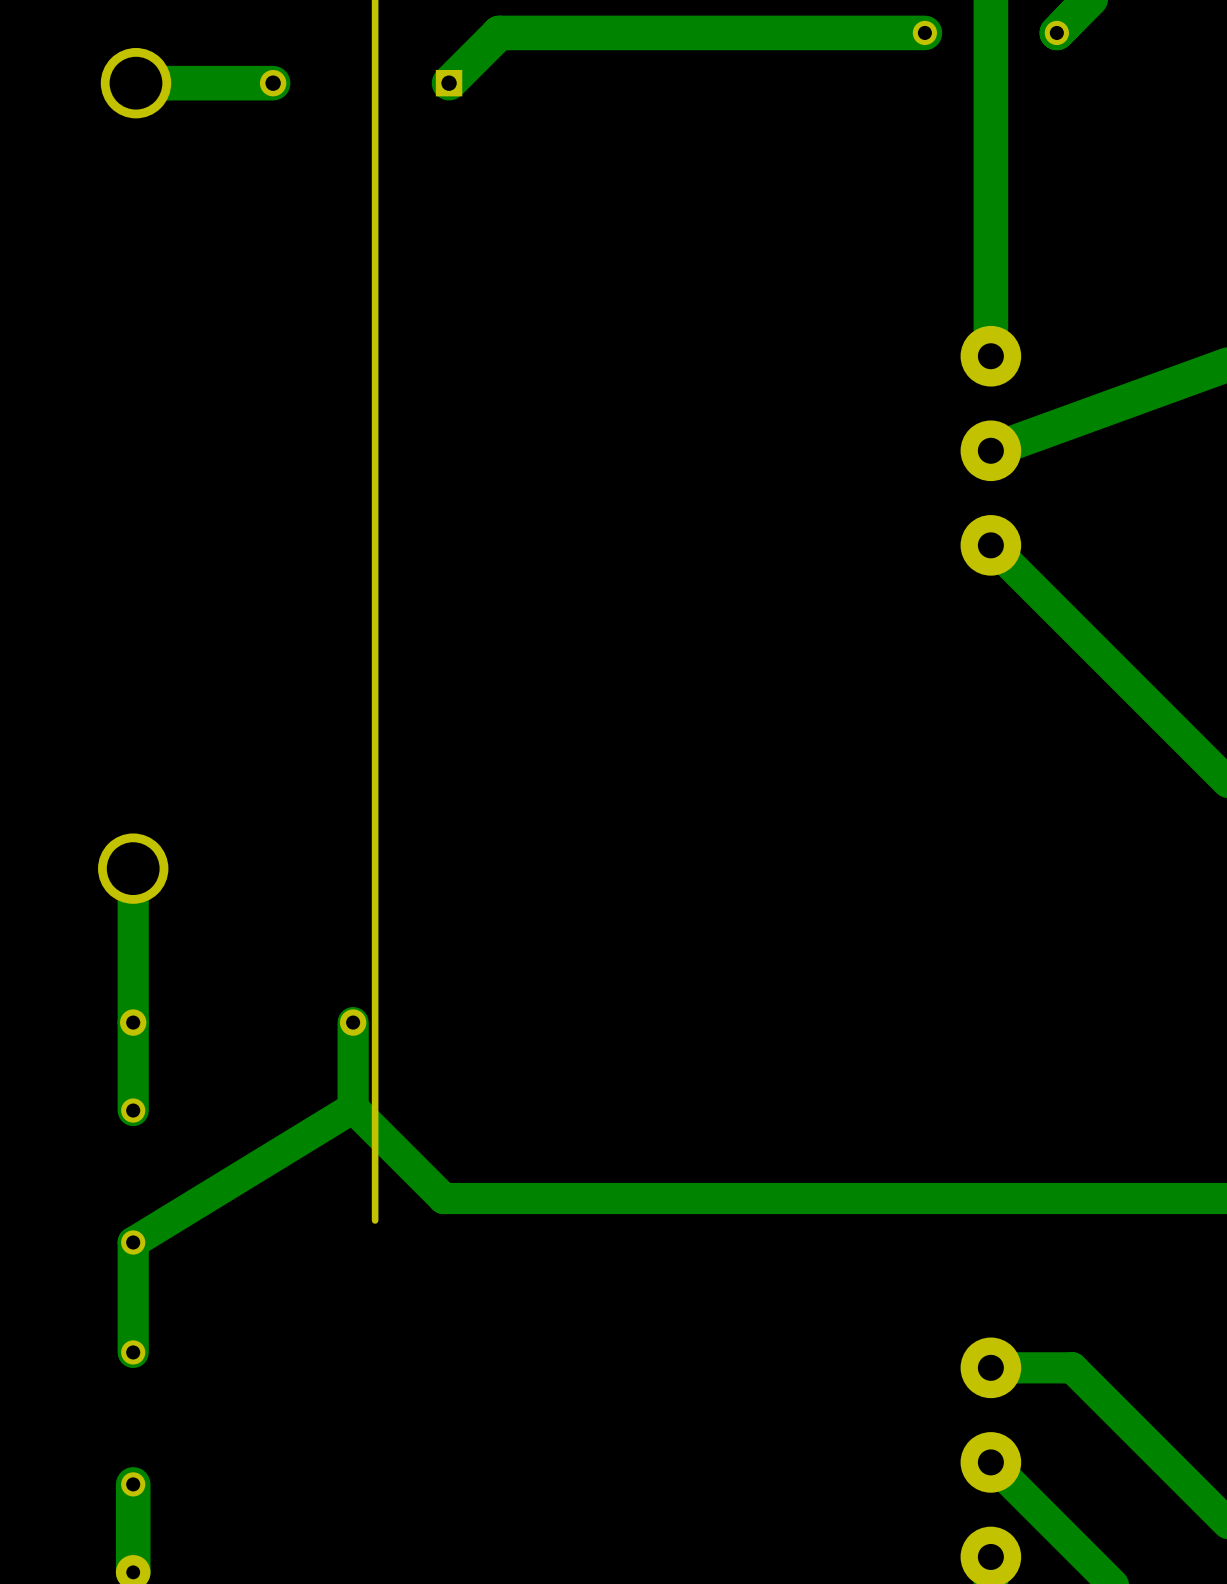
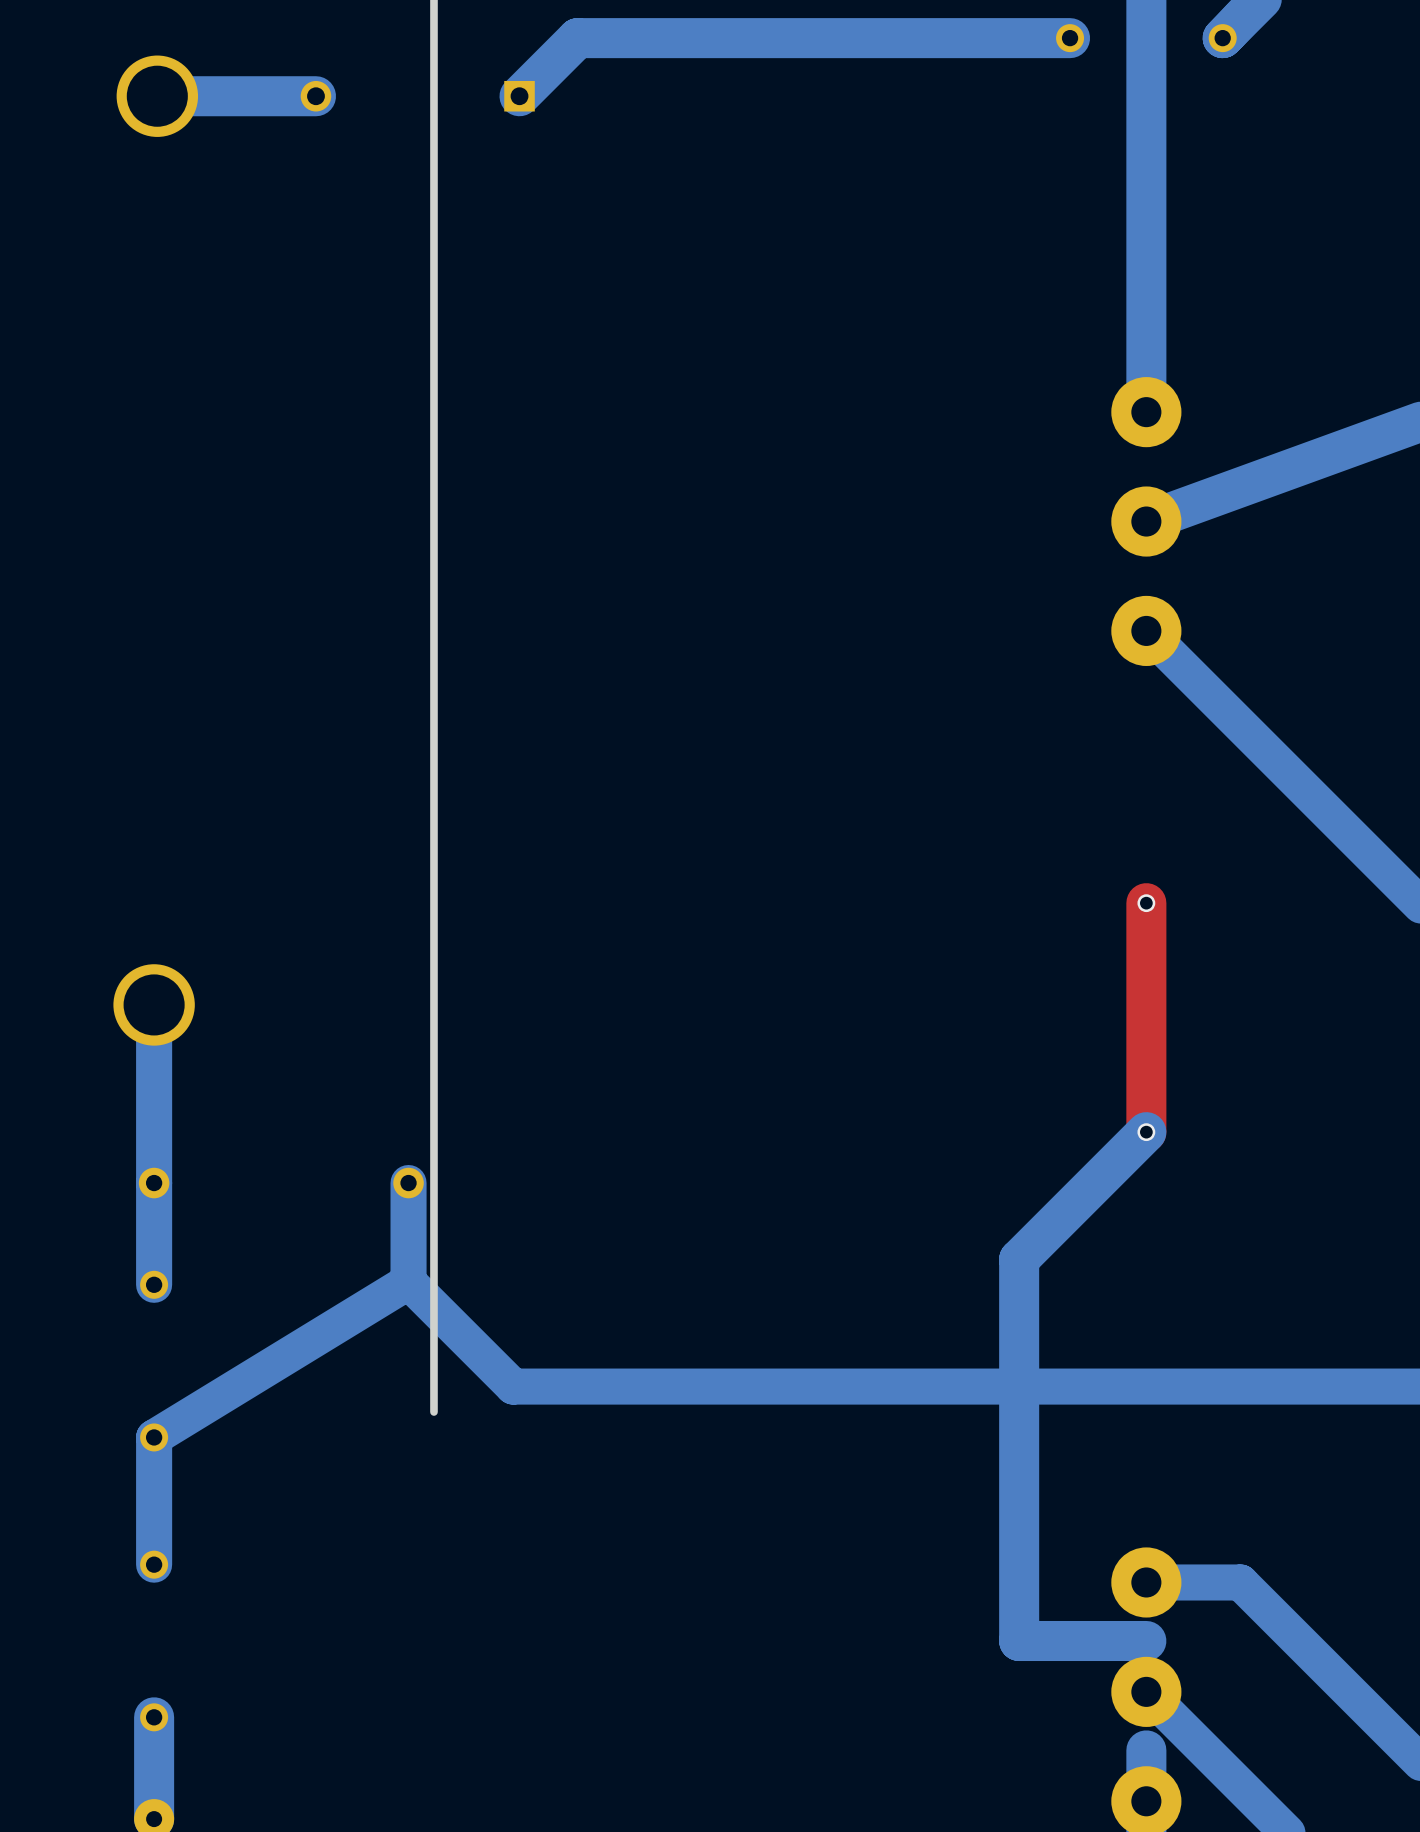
top track: none -> (1146, 903) (1146, 1132)
via: none -> (1146, 903)
bottom track: none -> (1146, 1132) (1019, 1259) (1019, 1641) (1146, 1641)
via: none -> (1146, 1132)
bottom track: none -> (1146, 1750) (1146, 1801)

